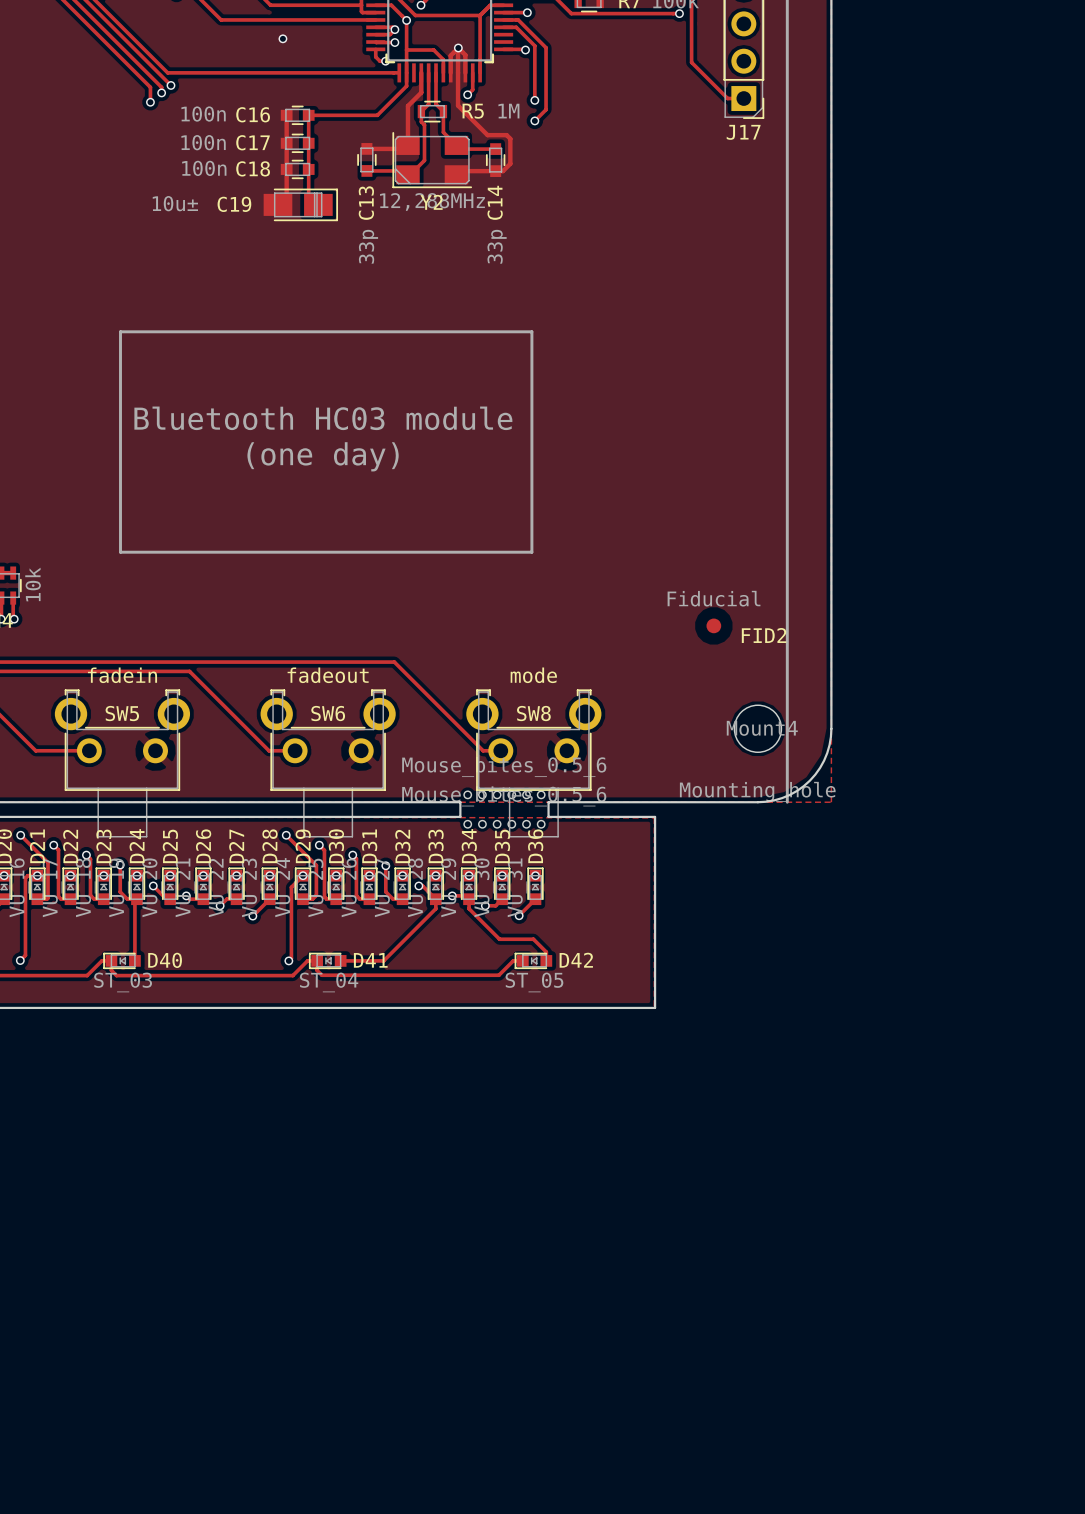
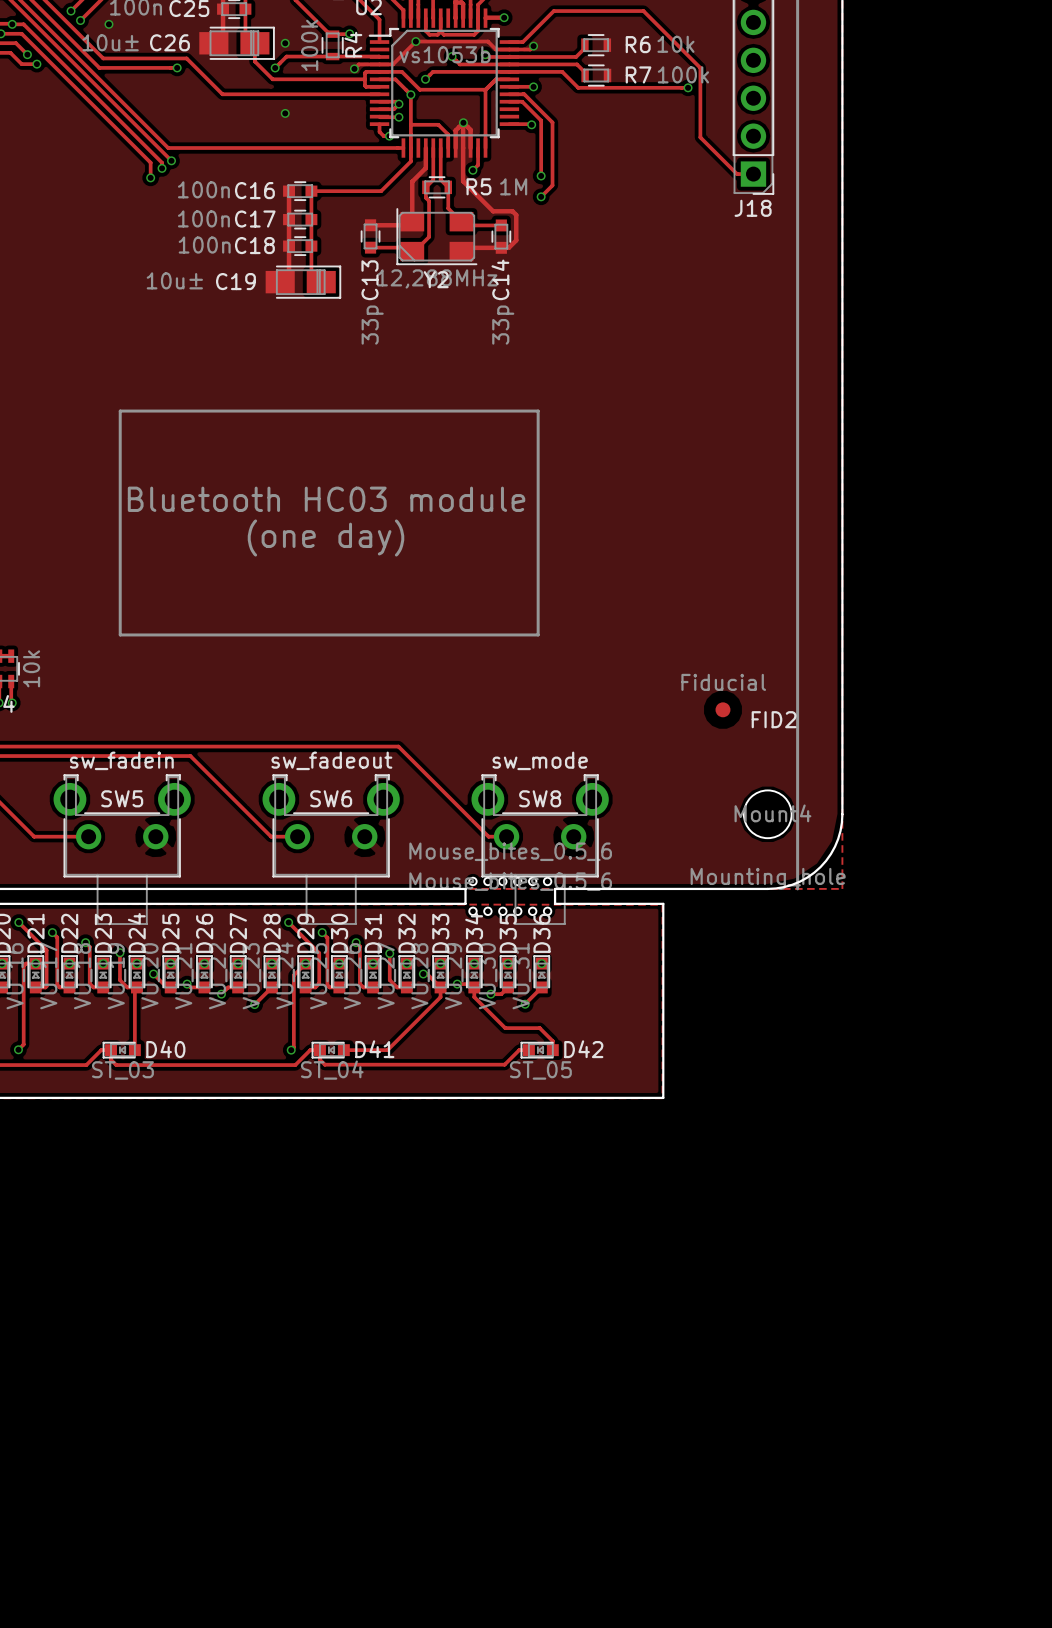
J17 name: J17 (743, 132) -> J18 (753, 208)
SW5 value: fadein (122, 675) -> sw_fadein (121, 760)
SW6 value: fadeout (328, 675) -> sw_fadeout (331, 760)
SW8 value: mode (533, 675) -> sw_mode (540, 760)

